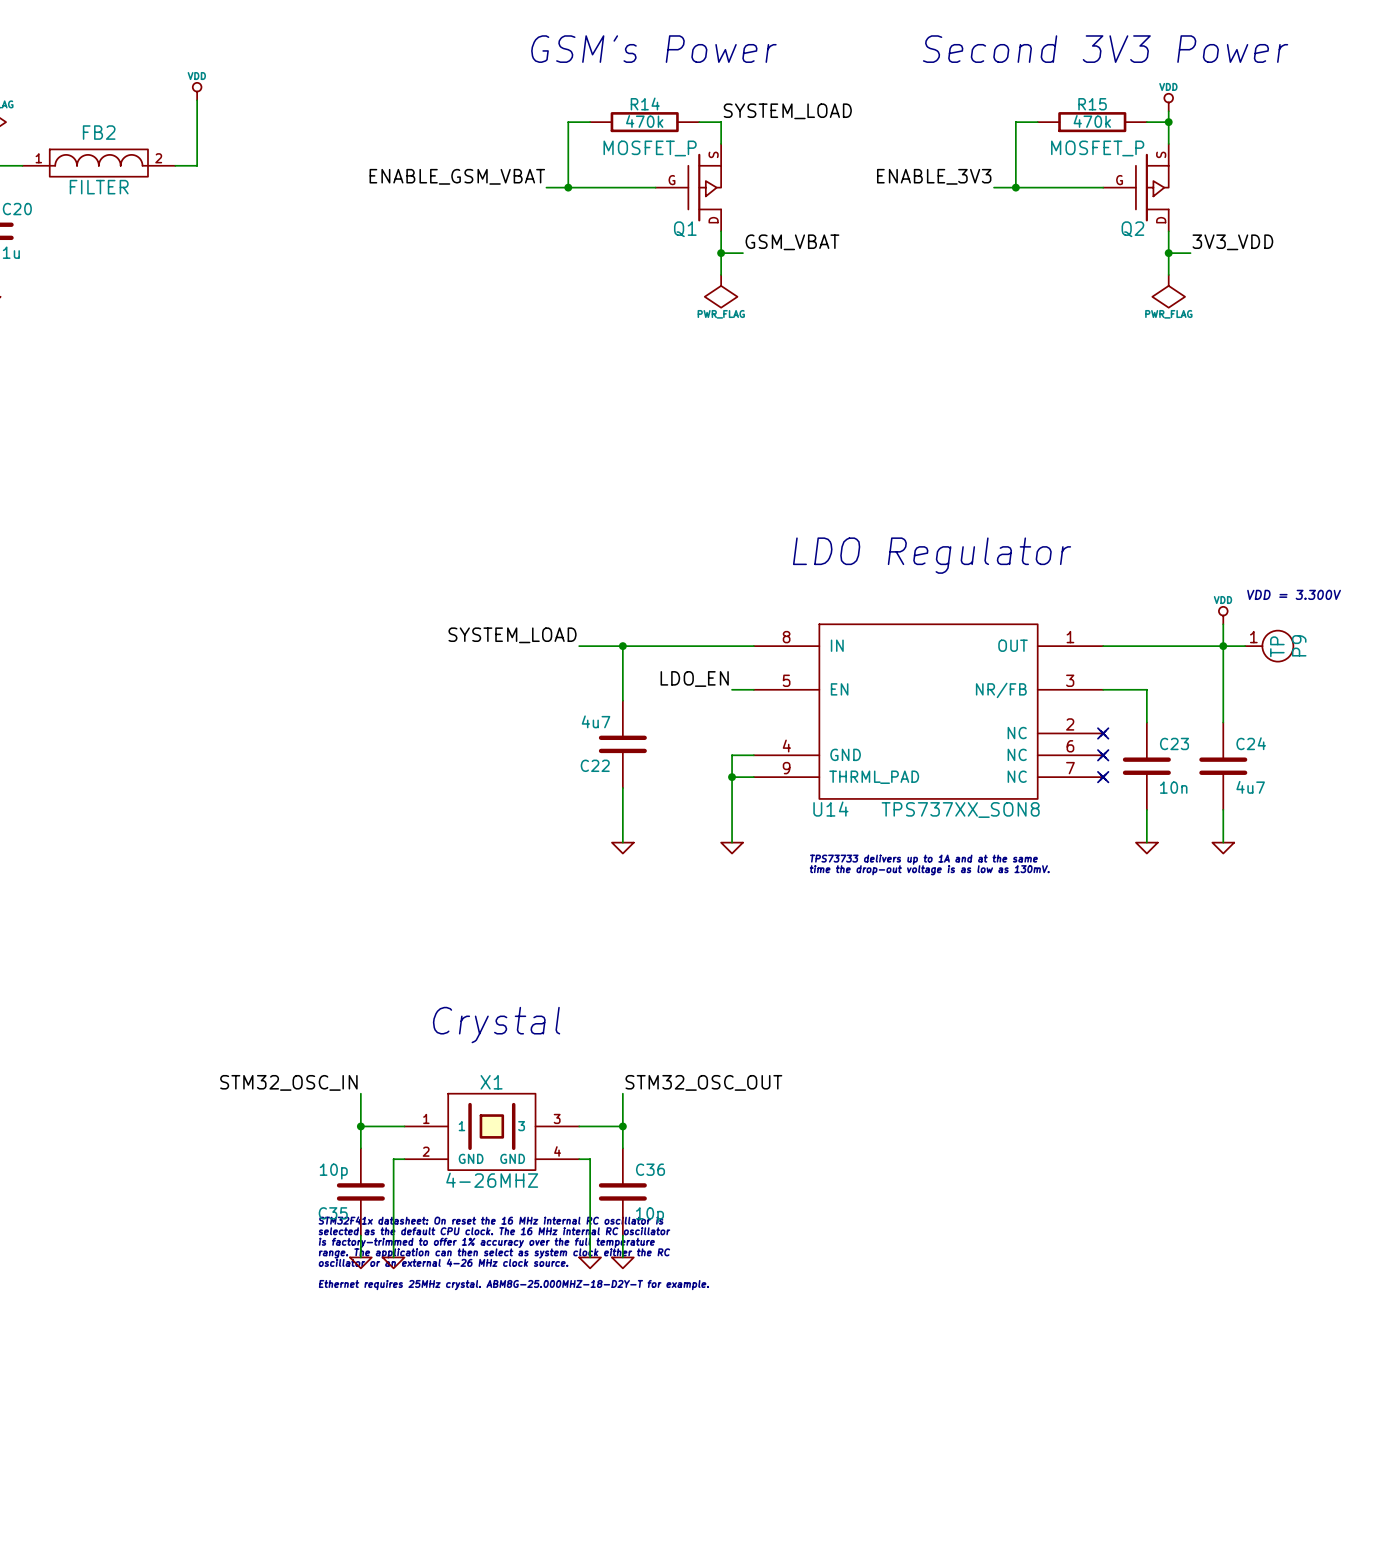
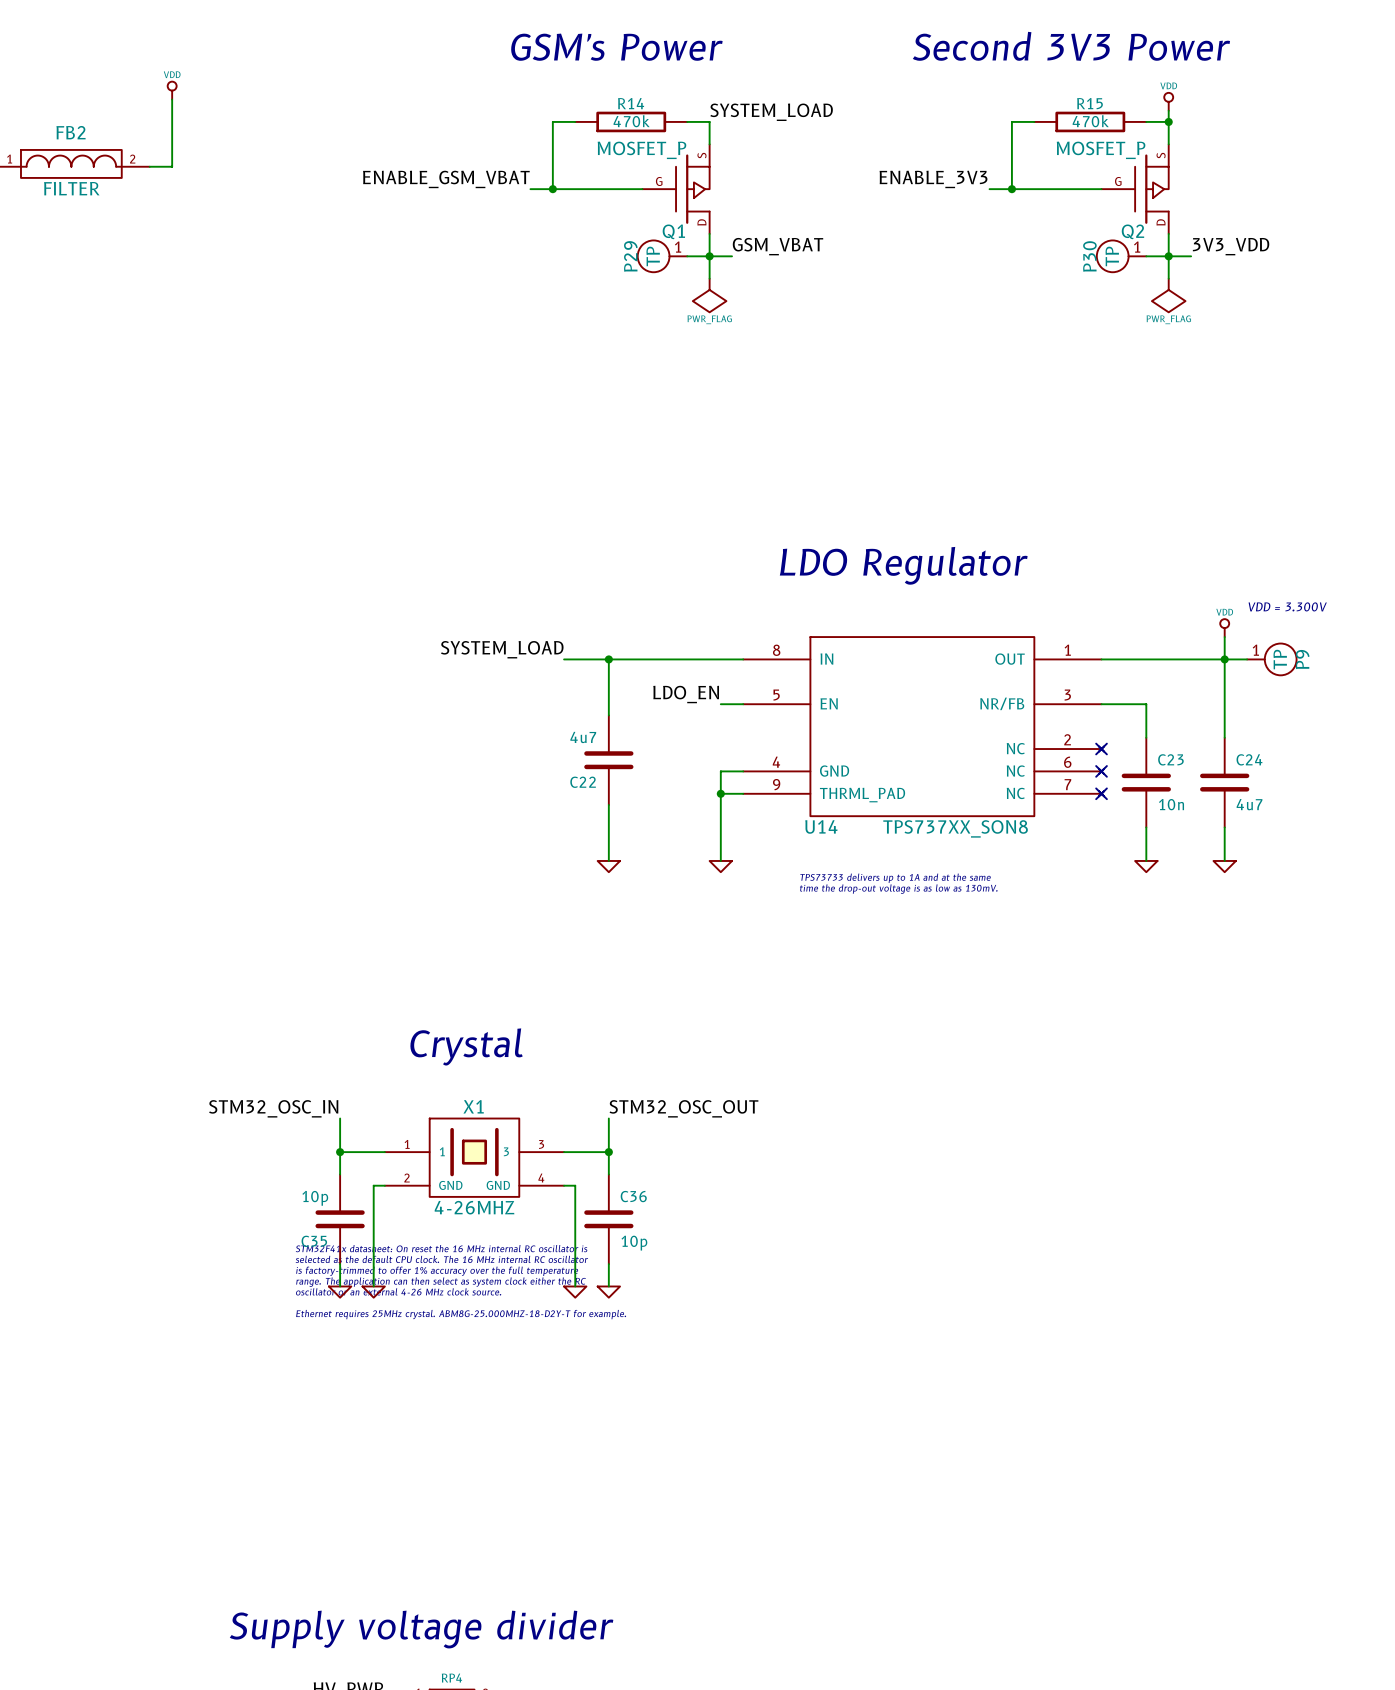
P29: none -> TP (662, 256)
wire: none -> (687, 256) (709, 256)
P30: none -> TP (1121, 256)
wire: none -> (1146, 256) (1168, 256)

